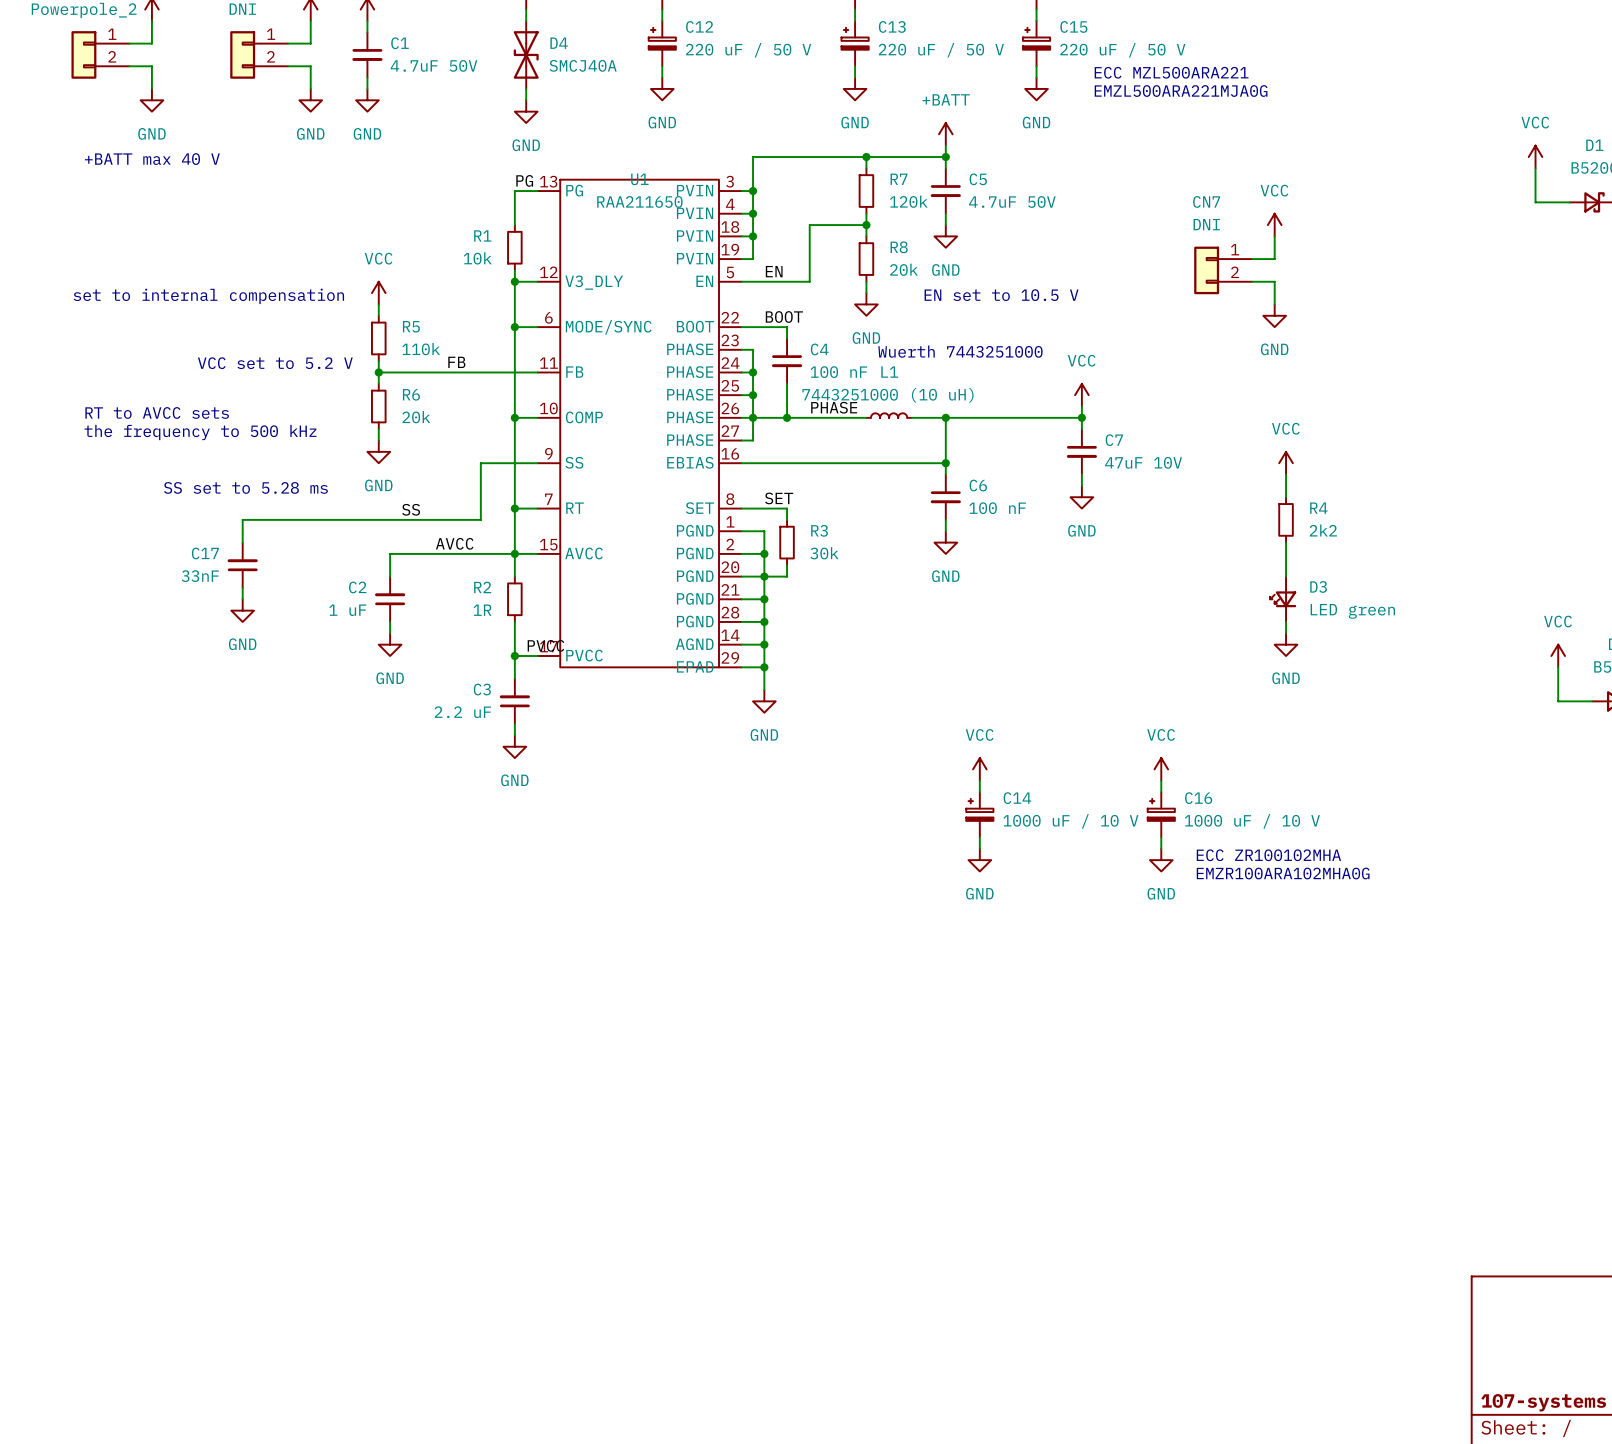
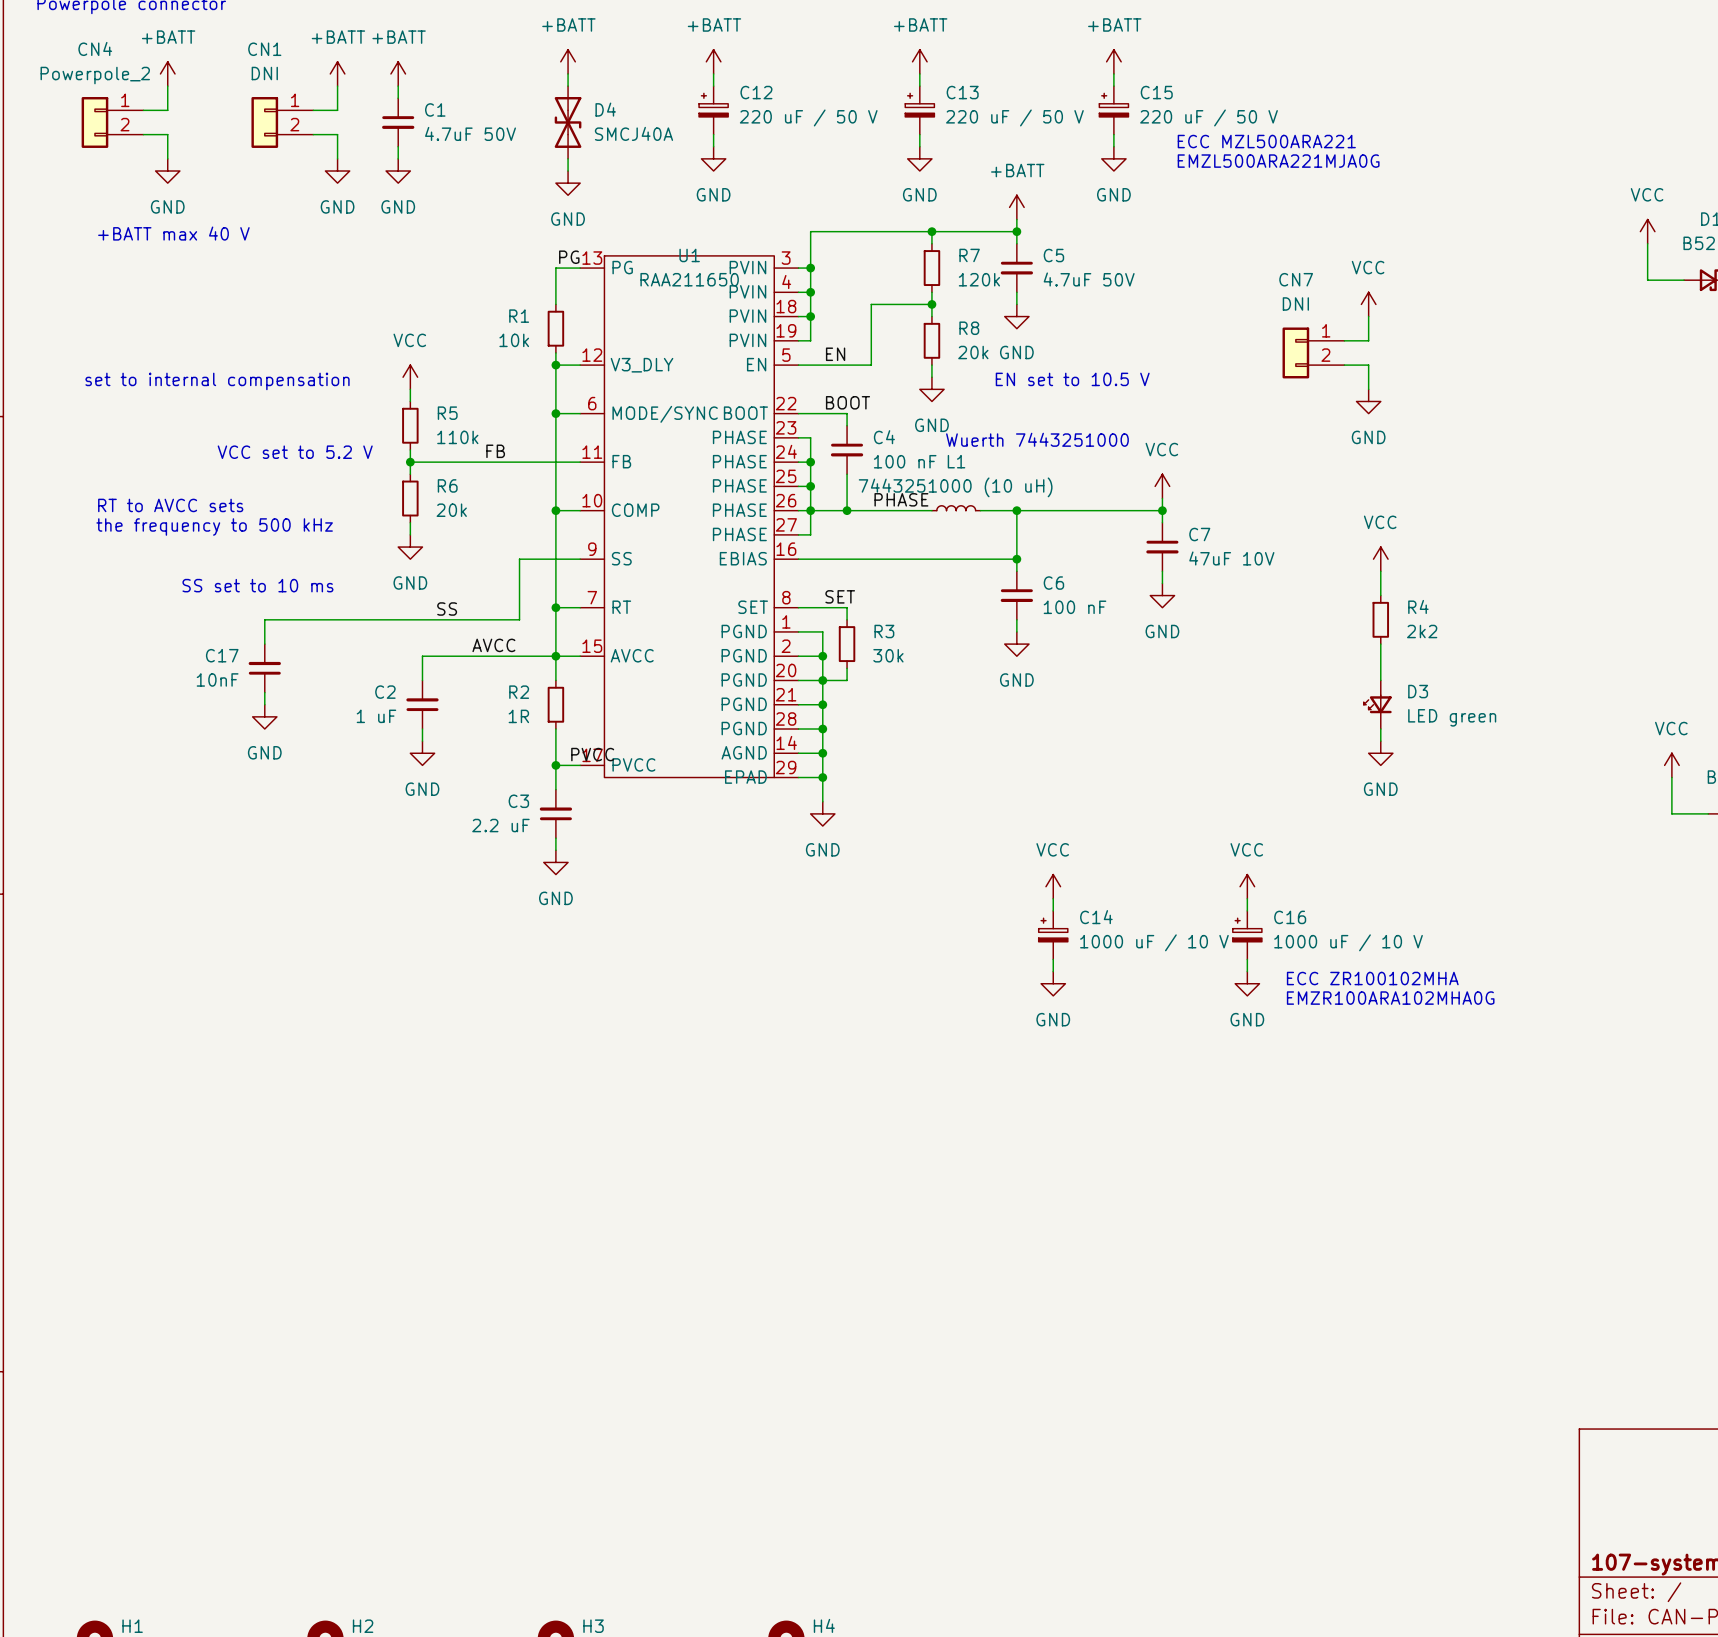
text: SS set to 5.28 ms (245, 487) -> SS set to 10 ms (257, 585)
C17 value: 33nF (200, 576) -> 10nF (217, 679)

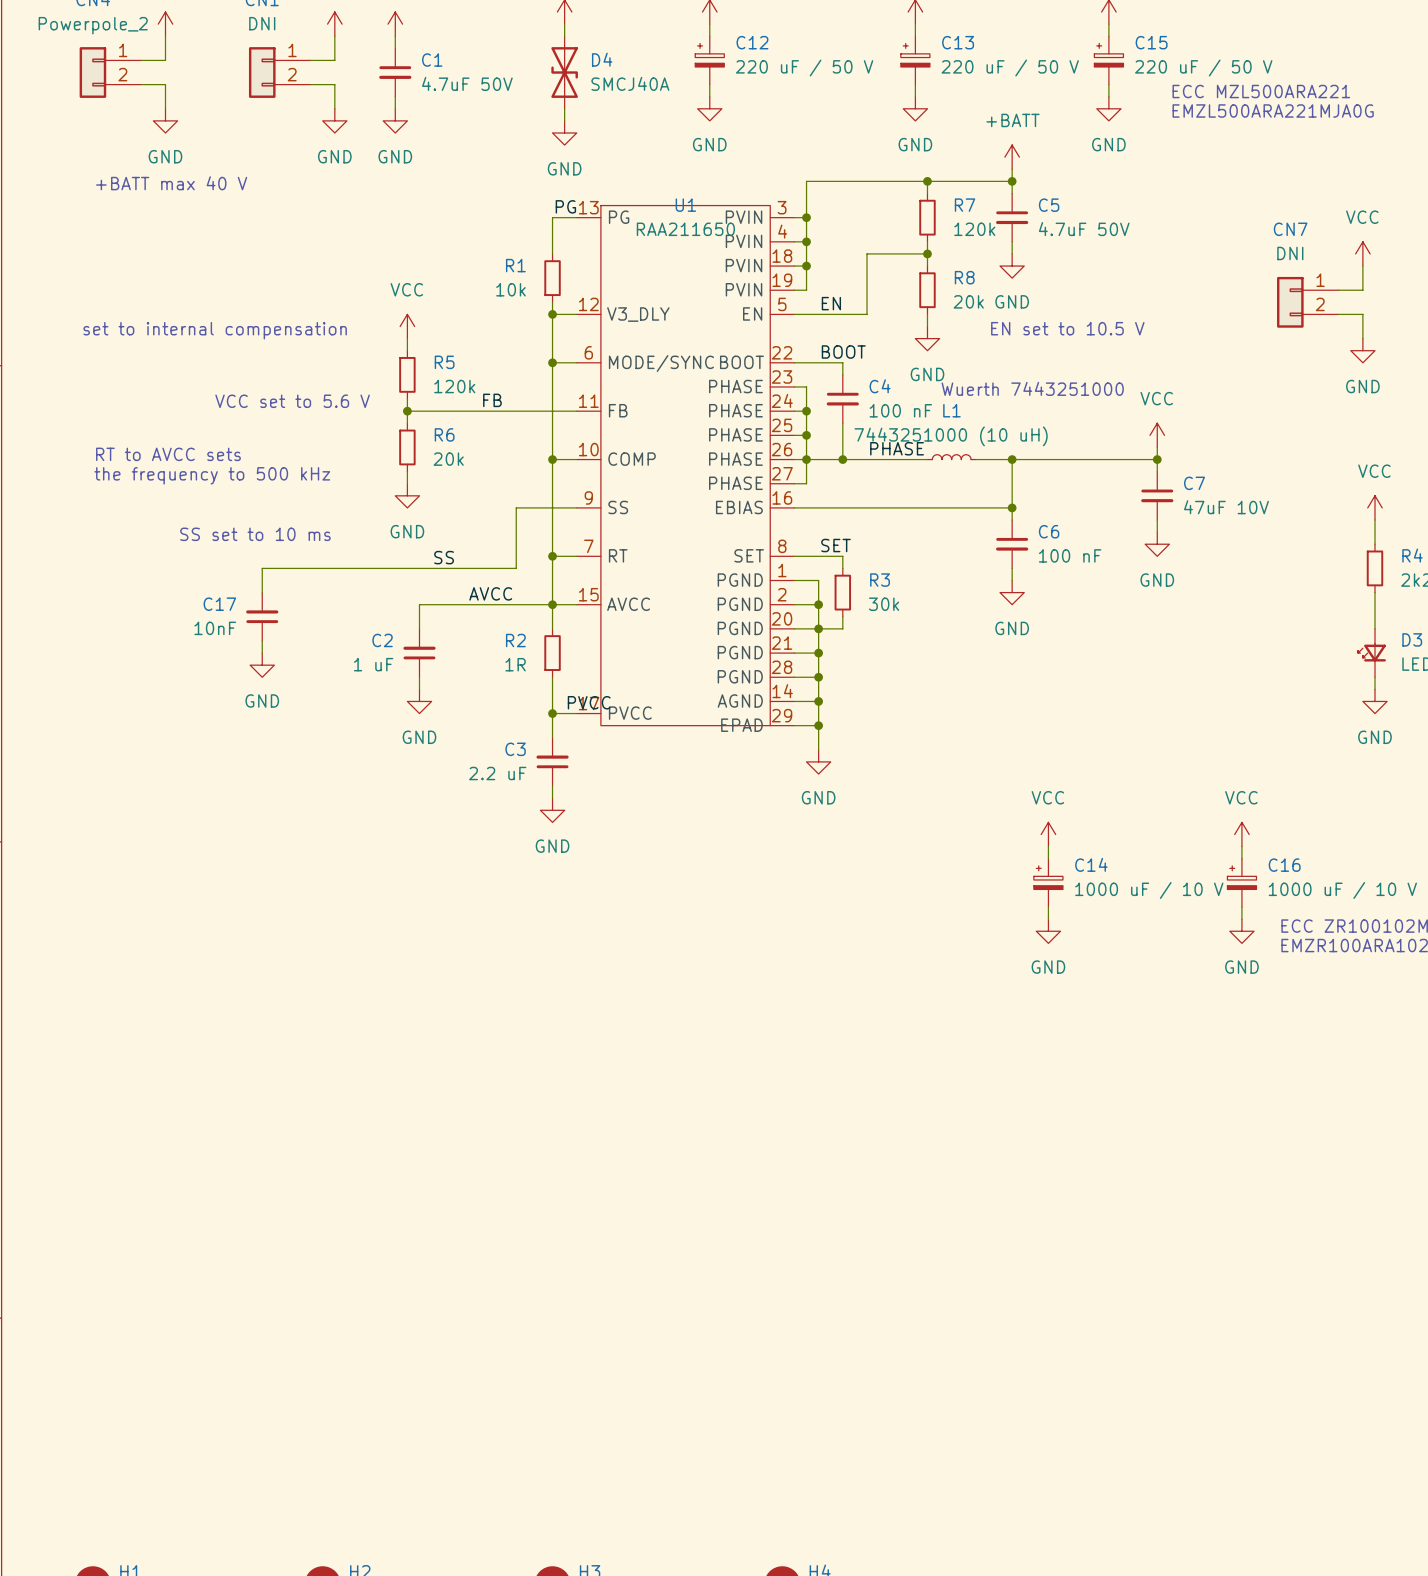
R5 value: 110k (457, 437) -> 120k (454, 386)
text: VCC set to 5.2 V (295, 452) -> VCC set to 5.6 V (292, 401)

